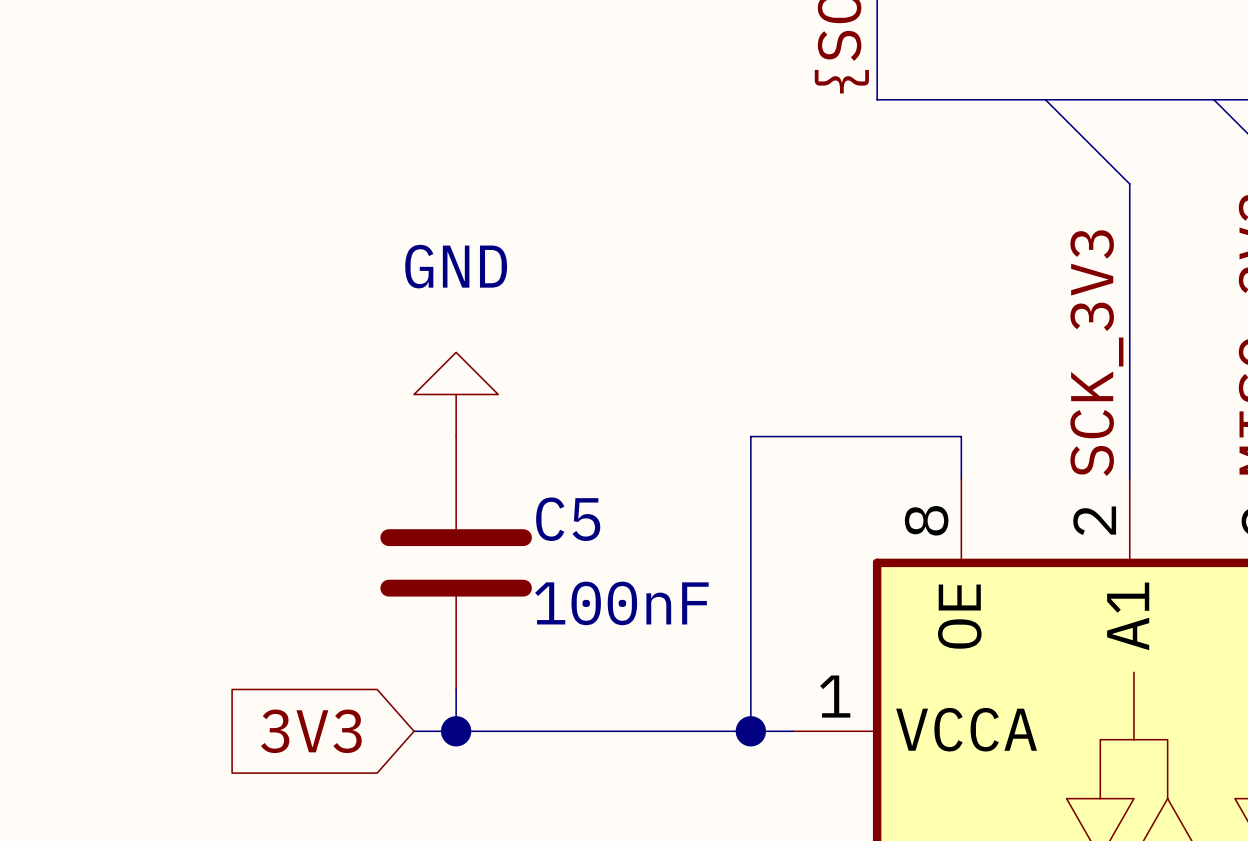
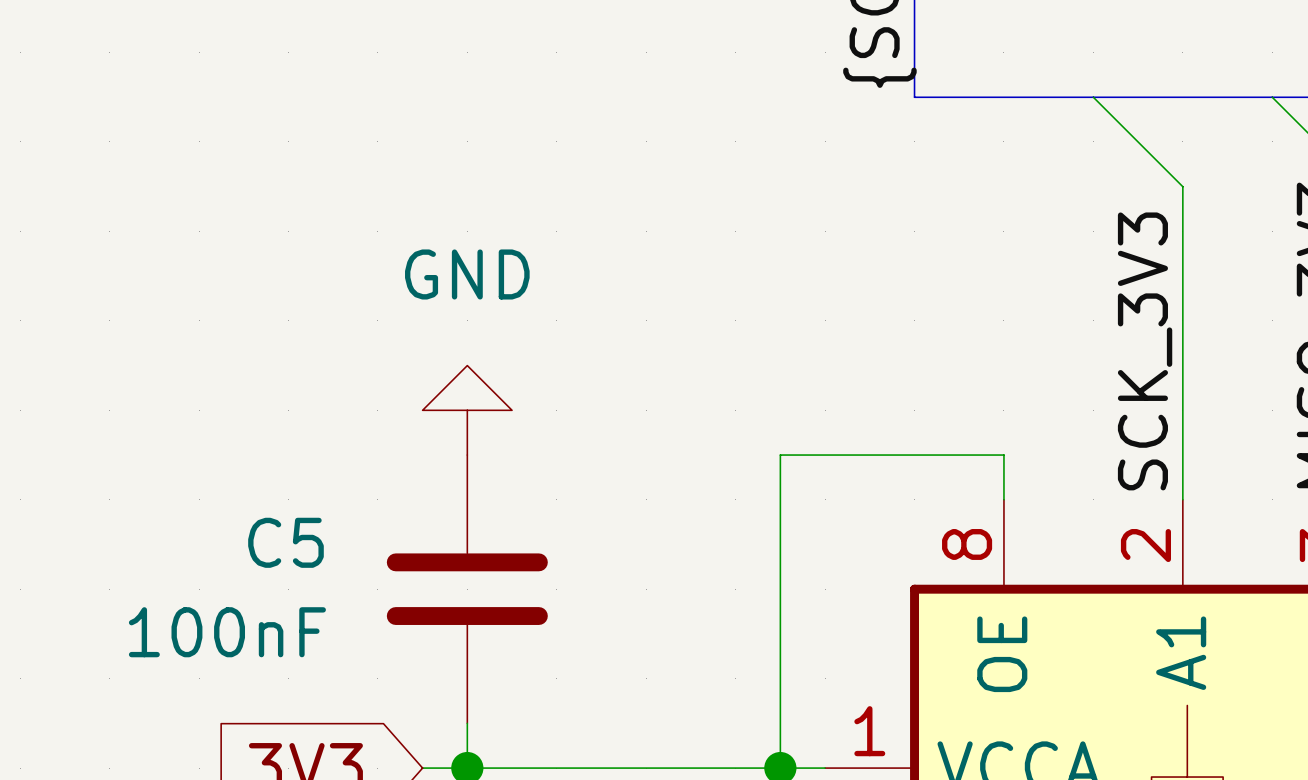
C5 name position: C5 (568, 519) -> C5 (285, 542)
C5 value position: 100nF (621, 603) -> 100nF (227, 632)

